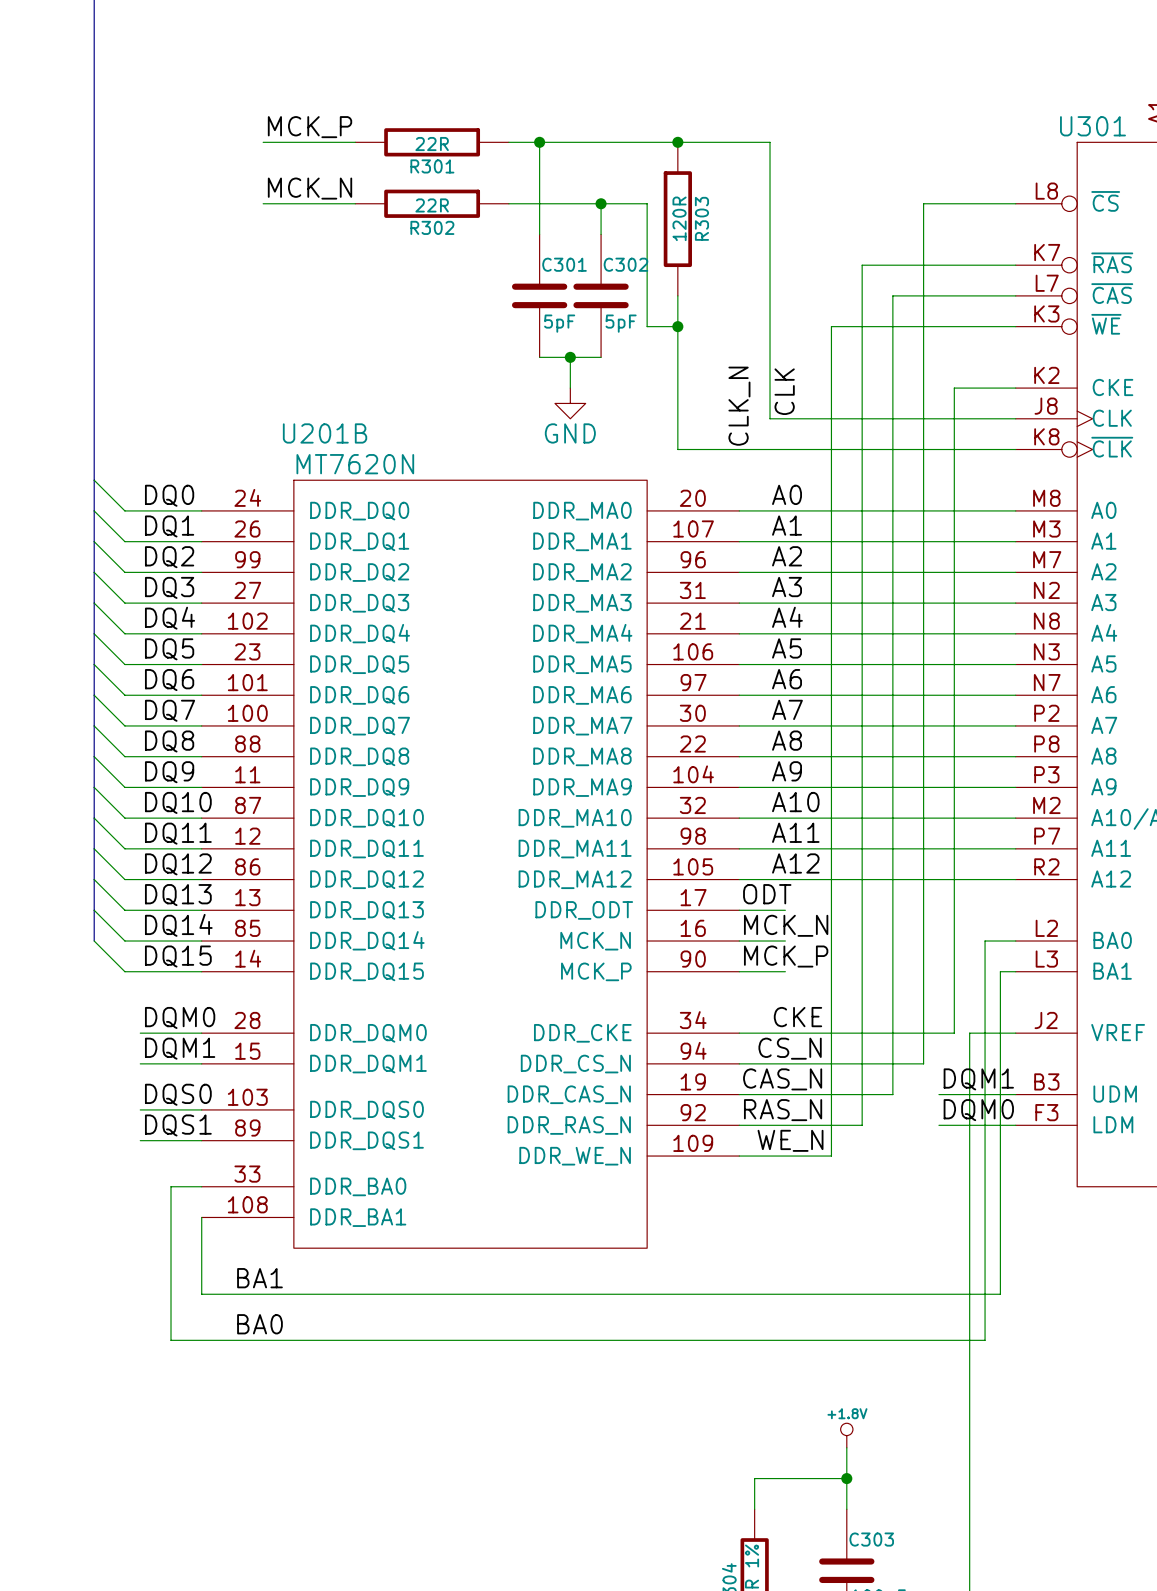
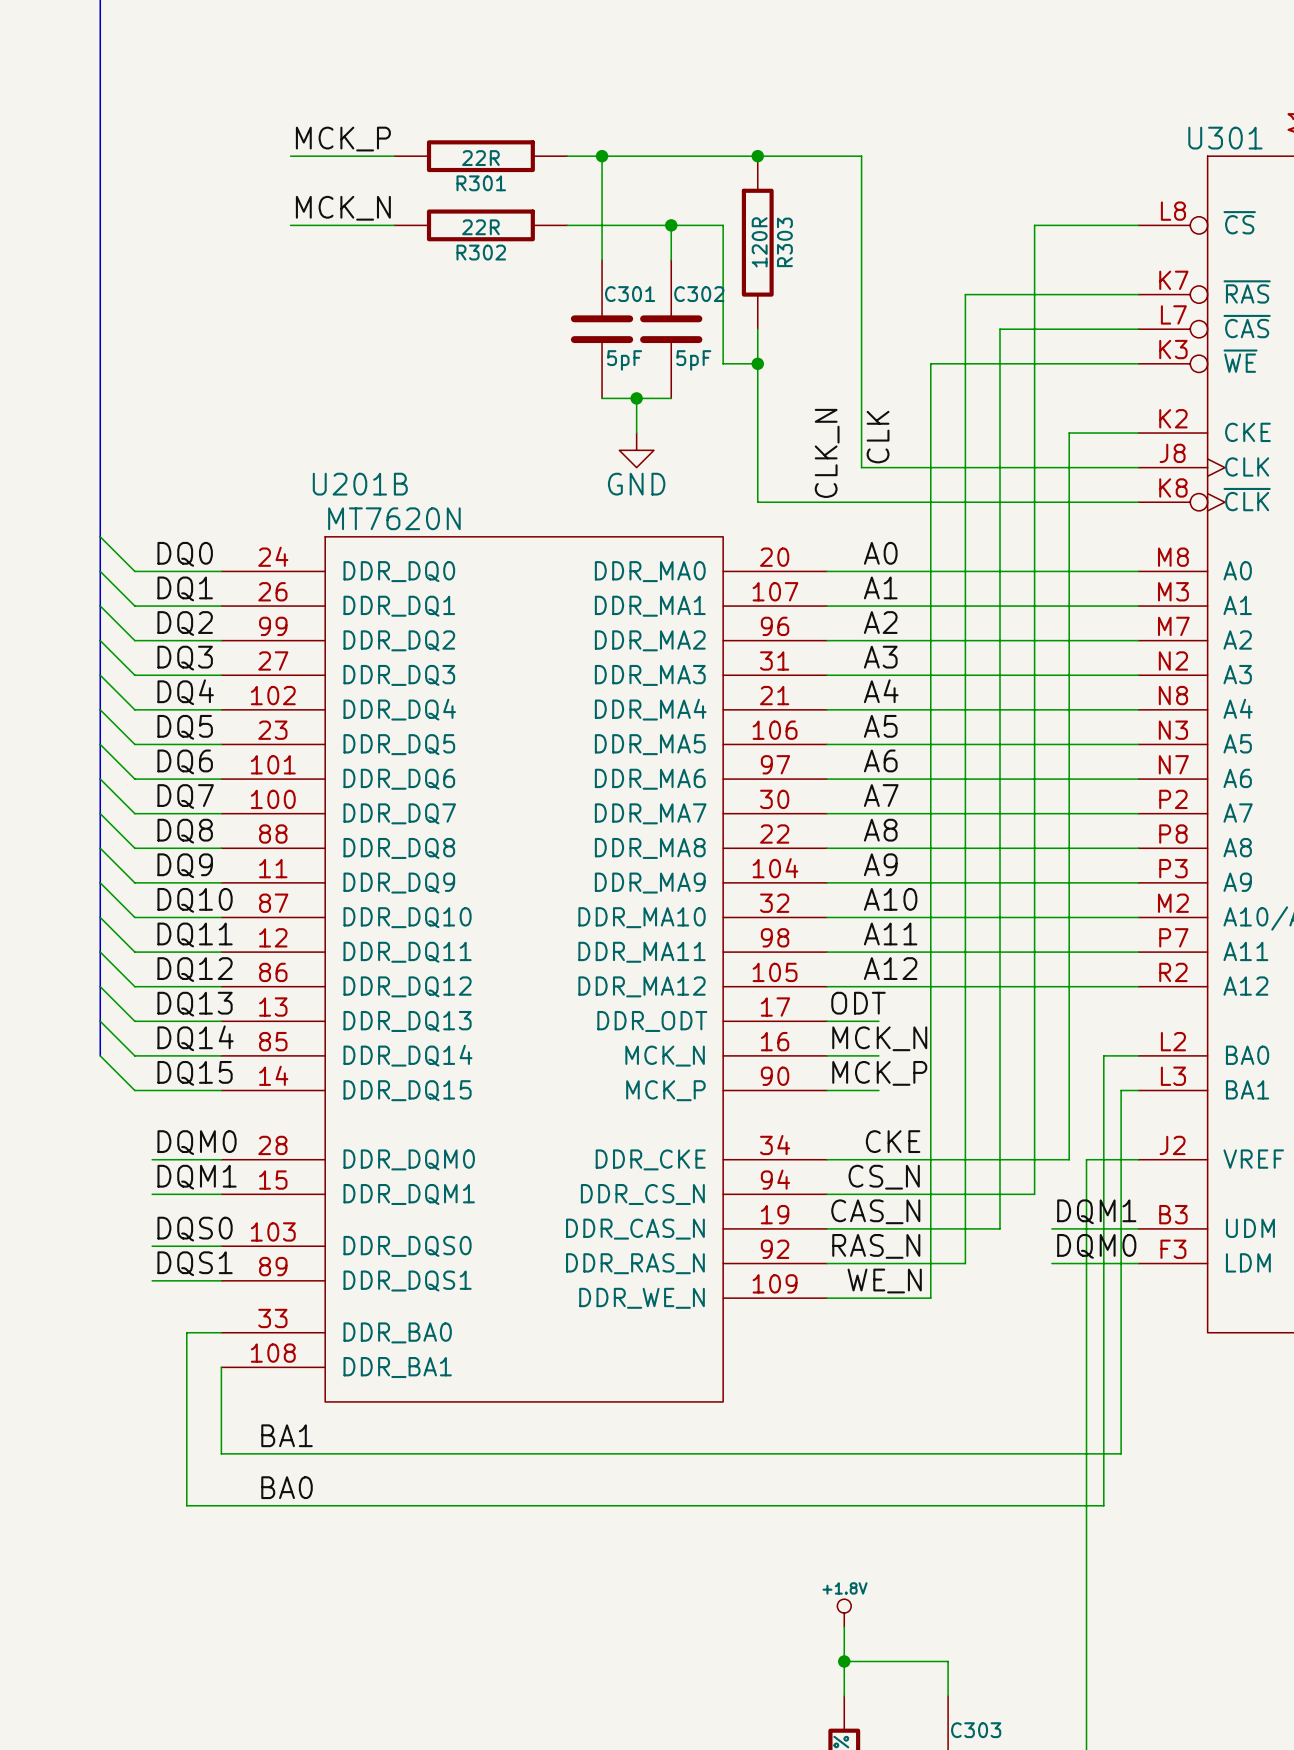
power symbol position: +1.8V (846, 1435) -> +1.8V (844, 1613)
wire: (846, 1447) (846, 1478) -> (844, 1626) (844, 1661)
junction: none -> (844, 1661)
junction: (846, 1478) -> none

